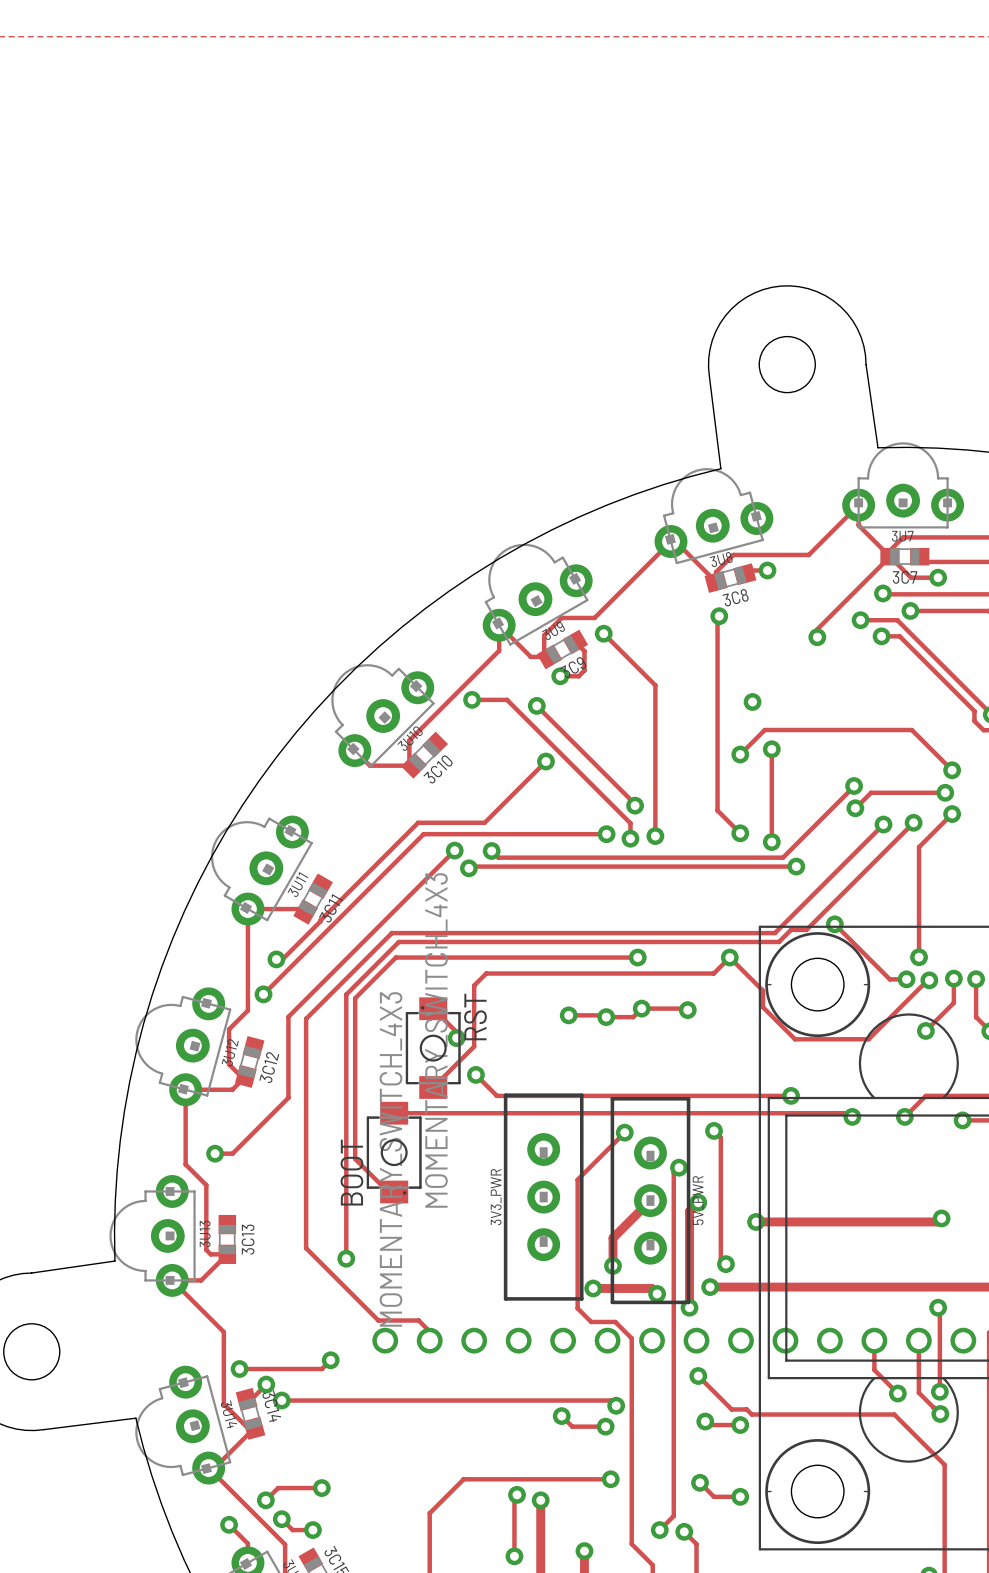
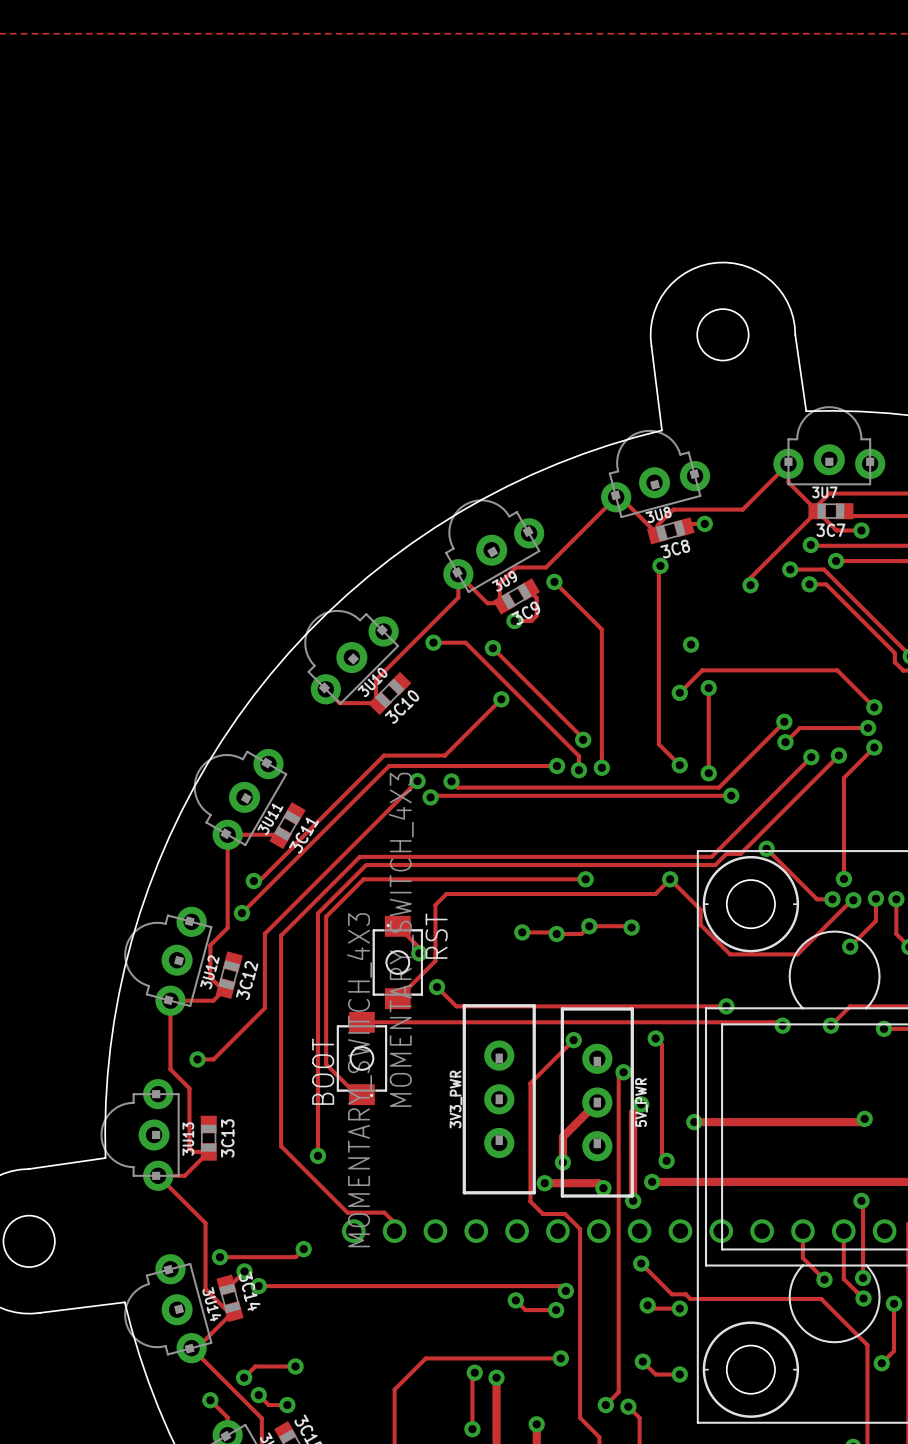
track: none -> (894, 1303) (894, 1351) (881, 1363)
via: none -> (894, 1303)
via: none -> (881, 1363)

